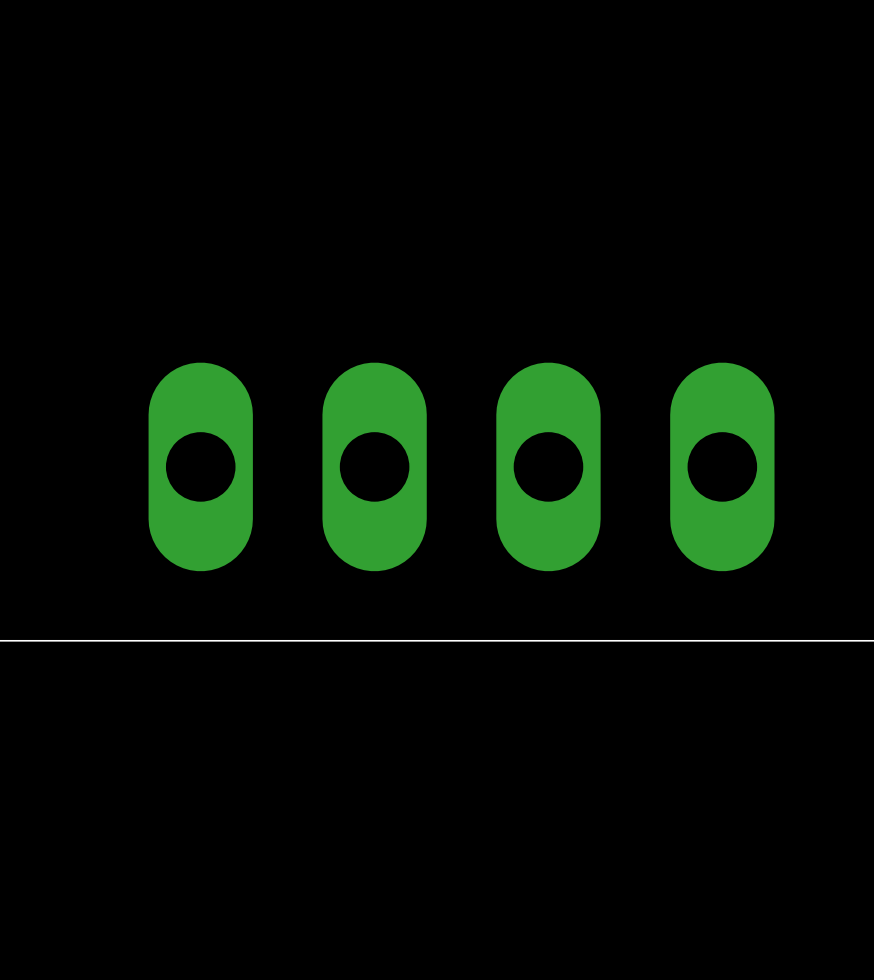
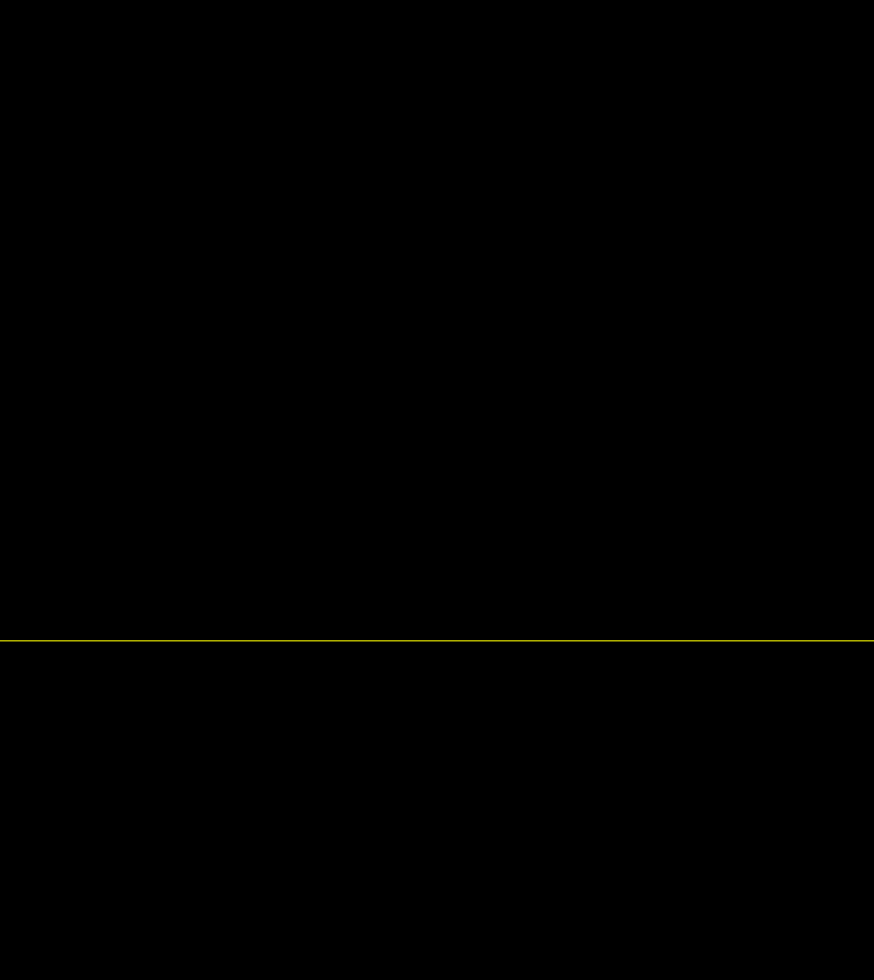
part: (461, 466) -> none

